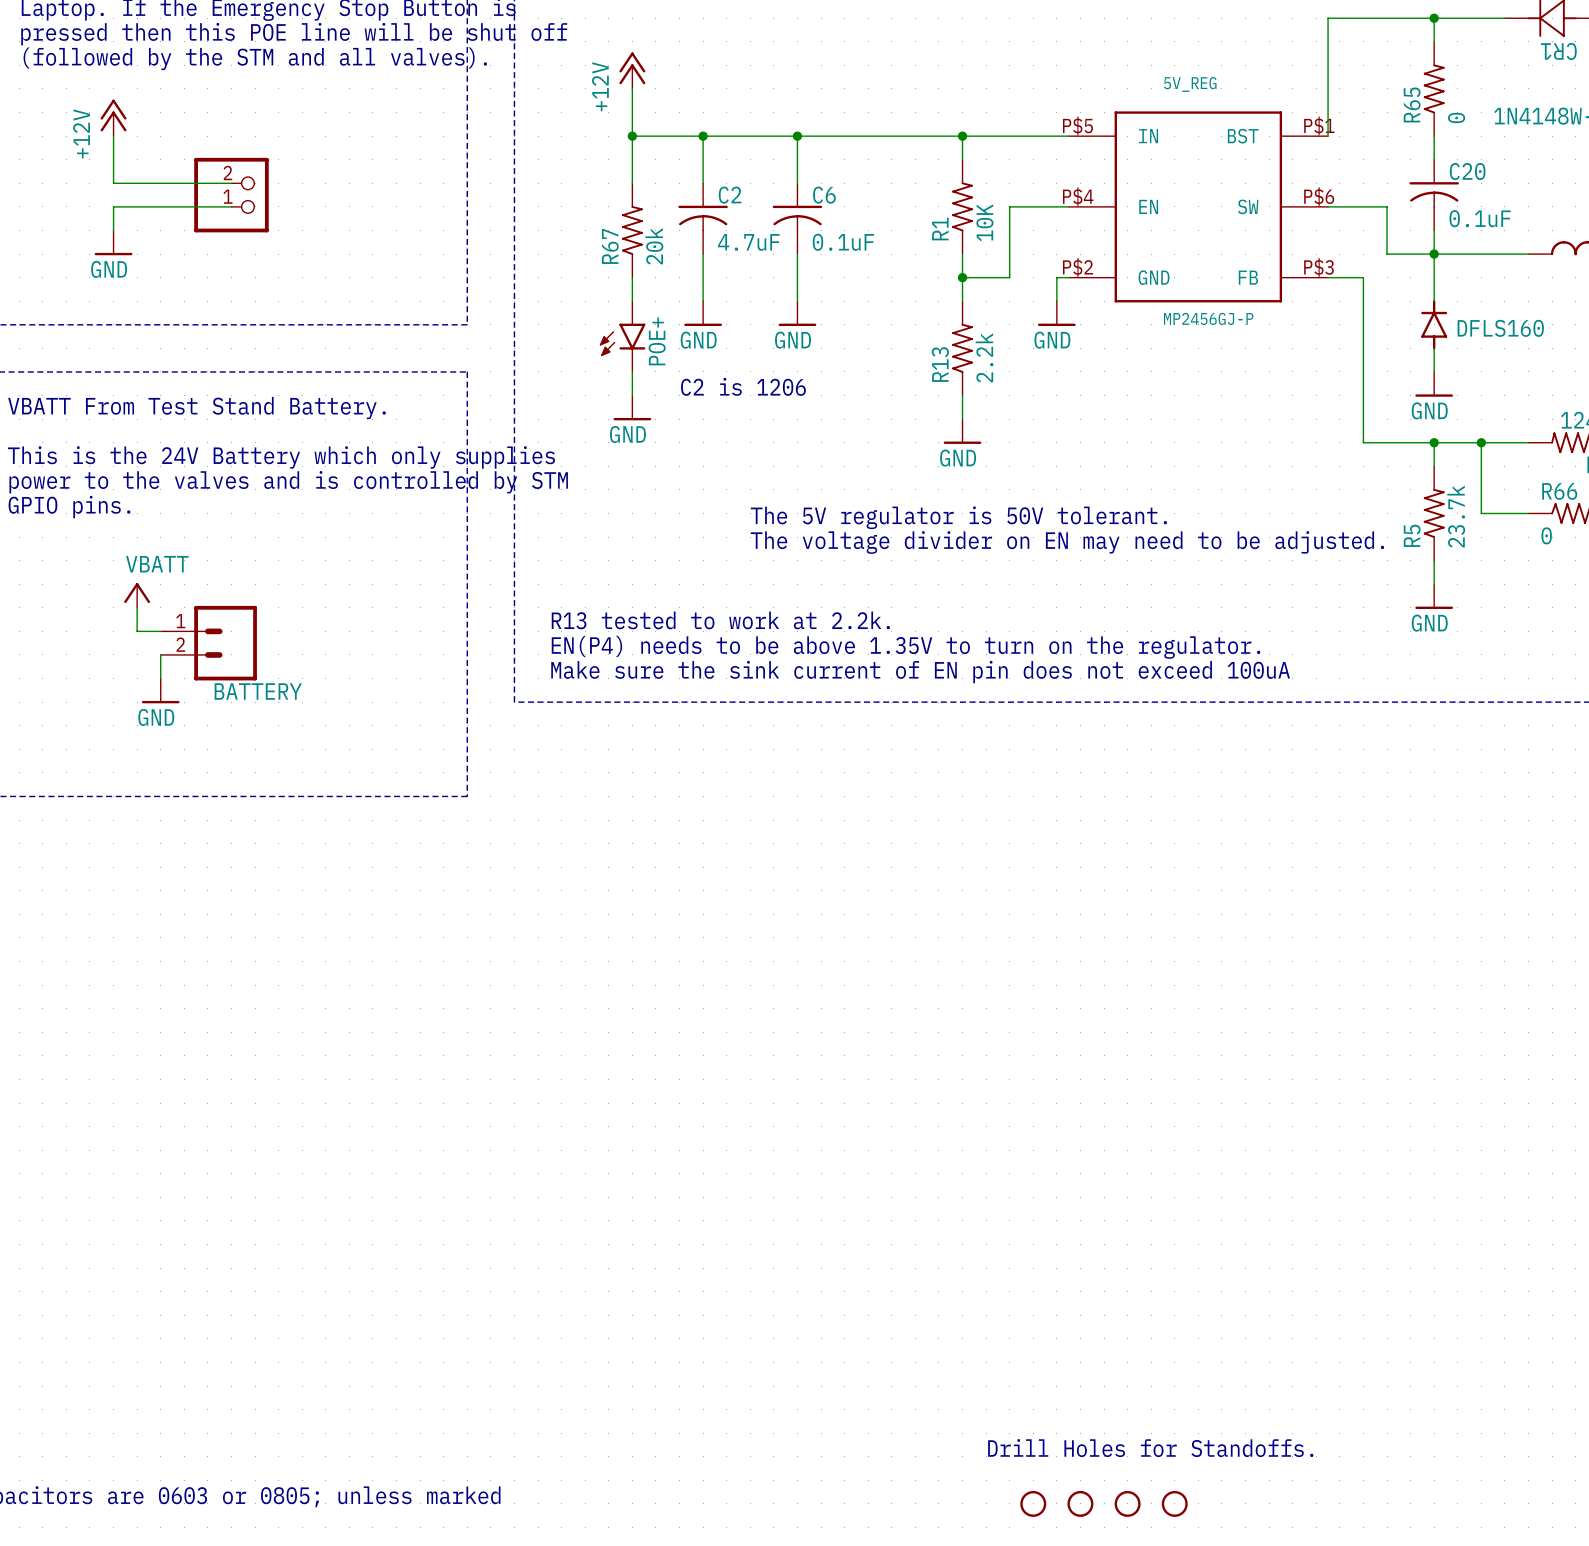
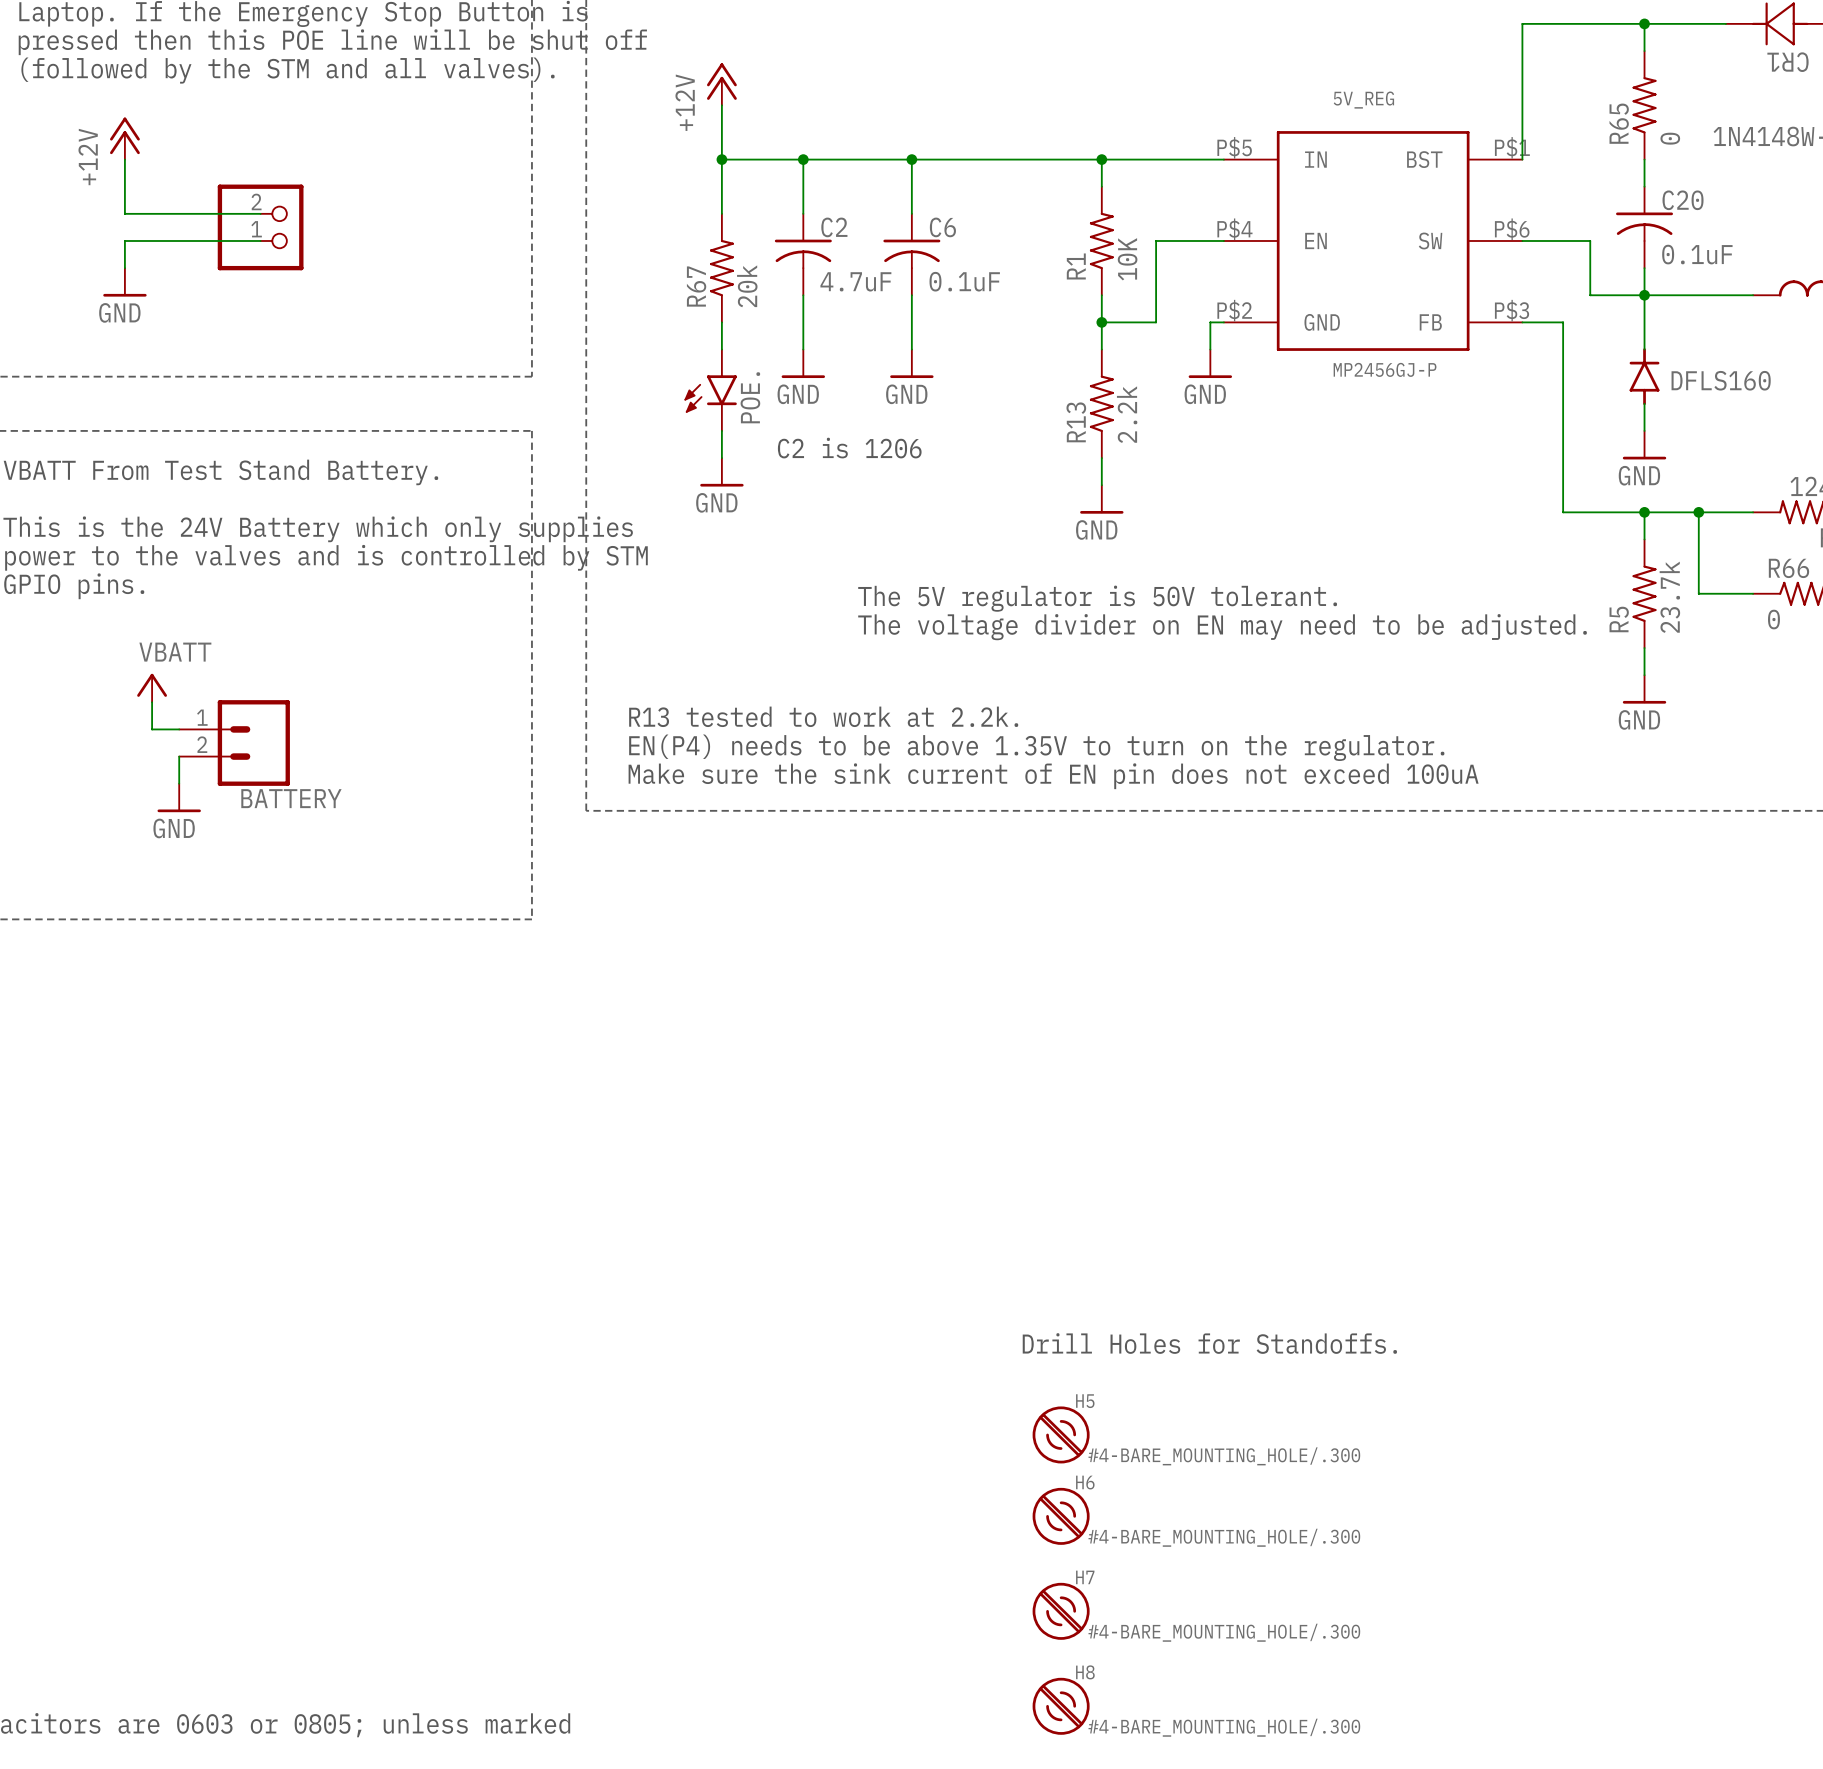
POE+ name: POE+ (657, 341) -> POE. (750, 397)
text: none -> Drill Holes for Standoffs. (1209, 1343)
H5: none -> #4-BARE_MOUNTING_HOLE/.300 (1061, 1434)
H6: none -> #4-BARE_MOUNTING_HOLE/.300 (1061, 1516)
H7: none -> #4-BARE_MOUNTING_HOLE/.300 (1061, 1611)
text: Drill Holes for Standoffs. (1150, 1448) -> none
H8: none -> #4-BARE_MOUNTING_HOLE/.300 (1061, 1706)
part: (1033, 1503) -> none
part: (1080, 1503) -> none
part: (1127, 1503) -> none
part: (1174, 1503) -> none

